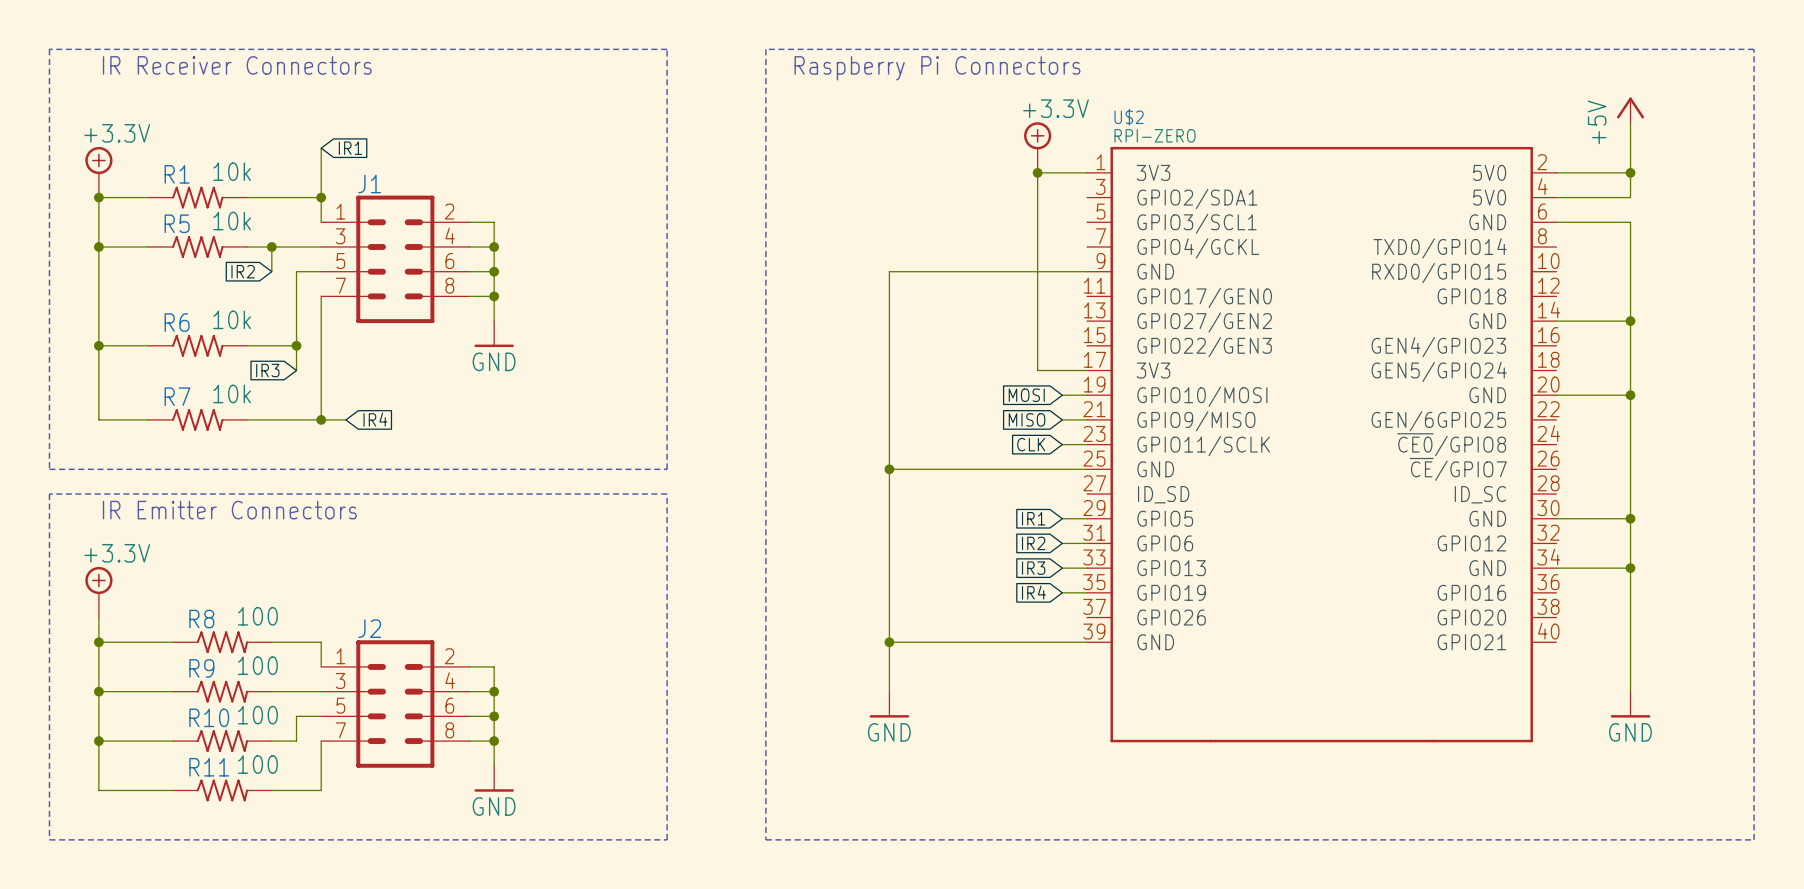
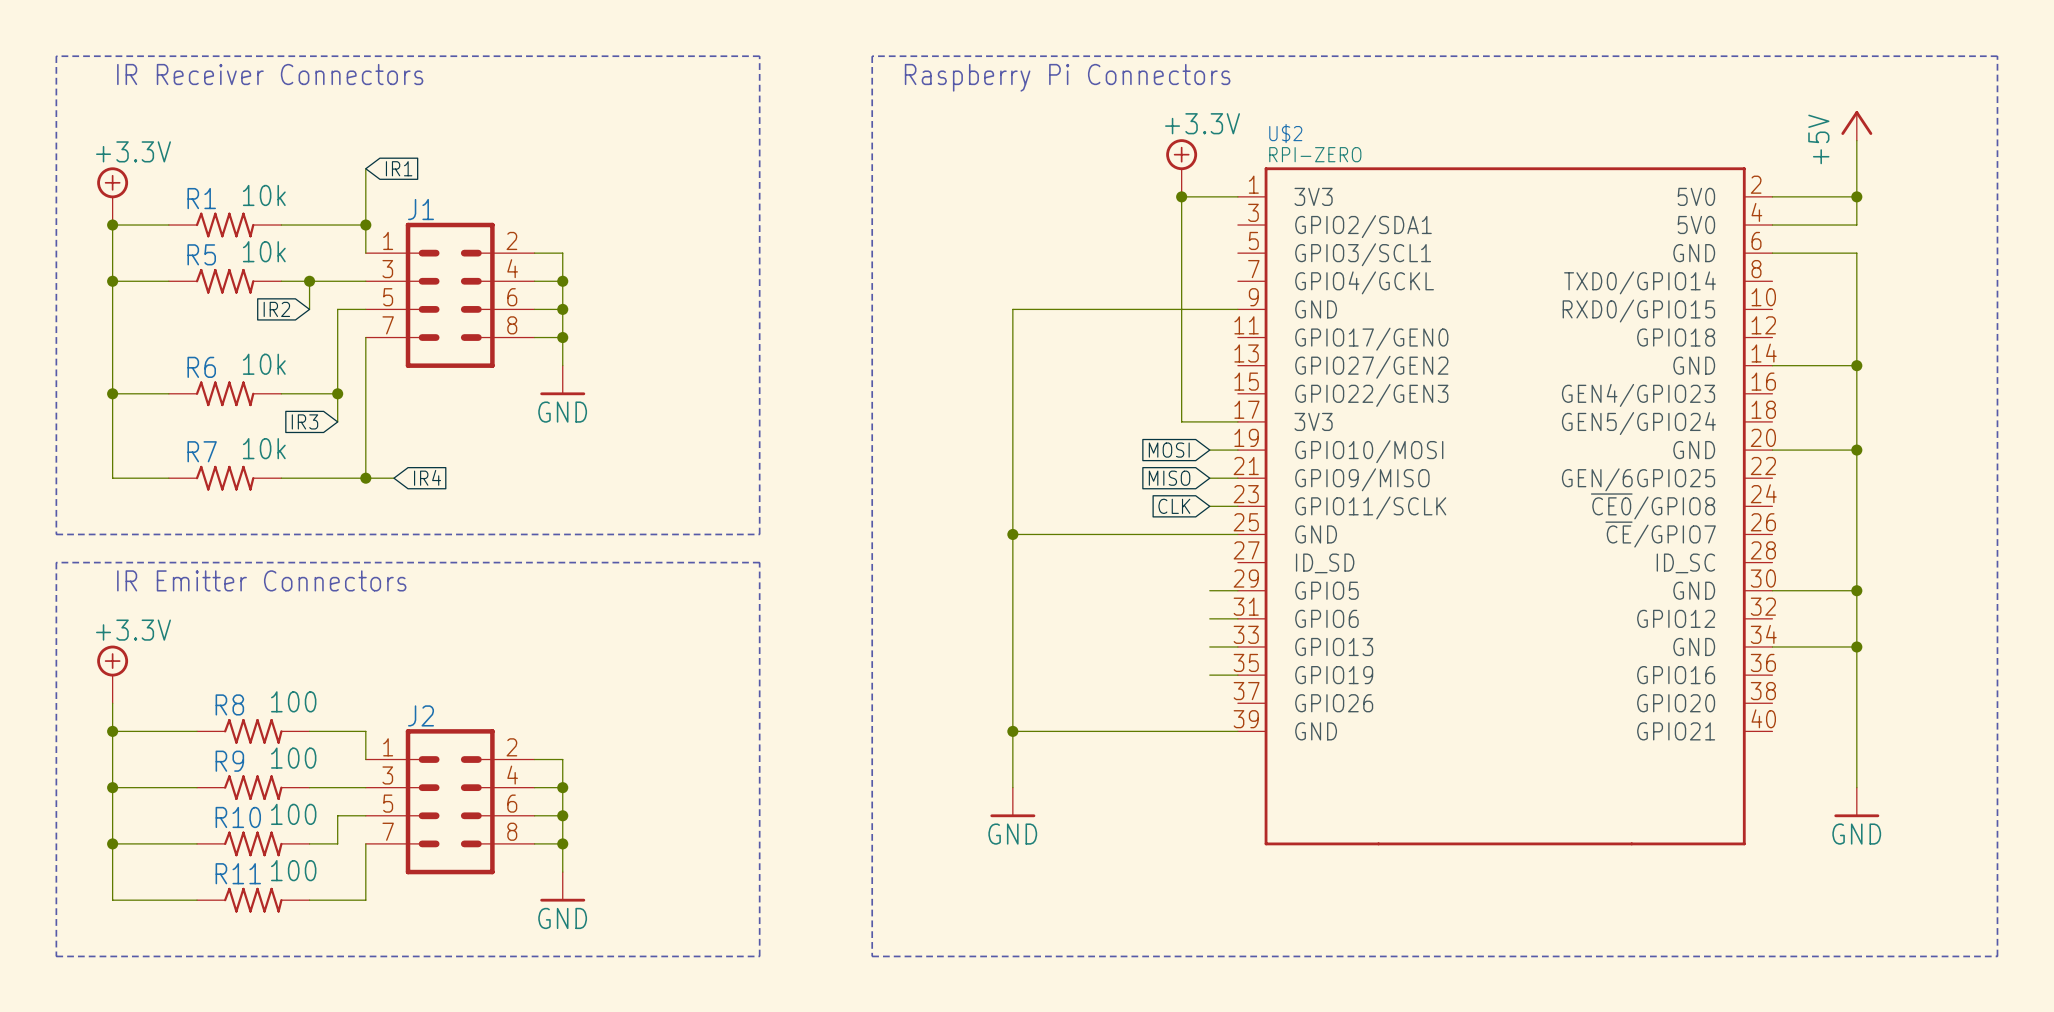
global label: IR1 (1033, 518) -> none
global label: IR2 (1033, 543) -> none
global label: IR3 (1033, 568) -> none
global label: IR4 (1033, 592) -> none

